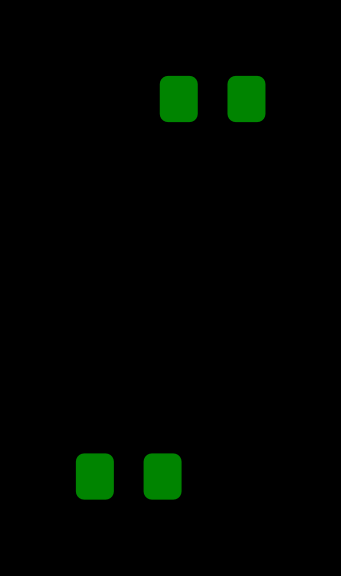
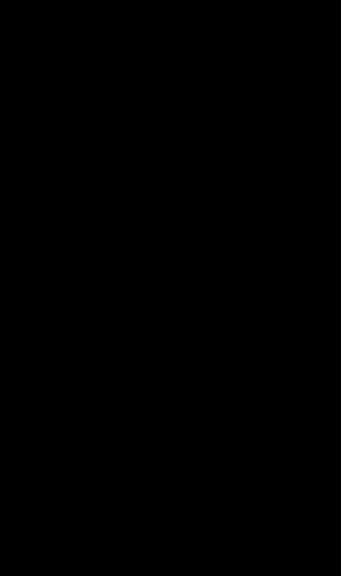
part: (212, 98) -> none
part: (128, 476) -> none

